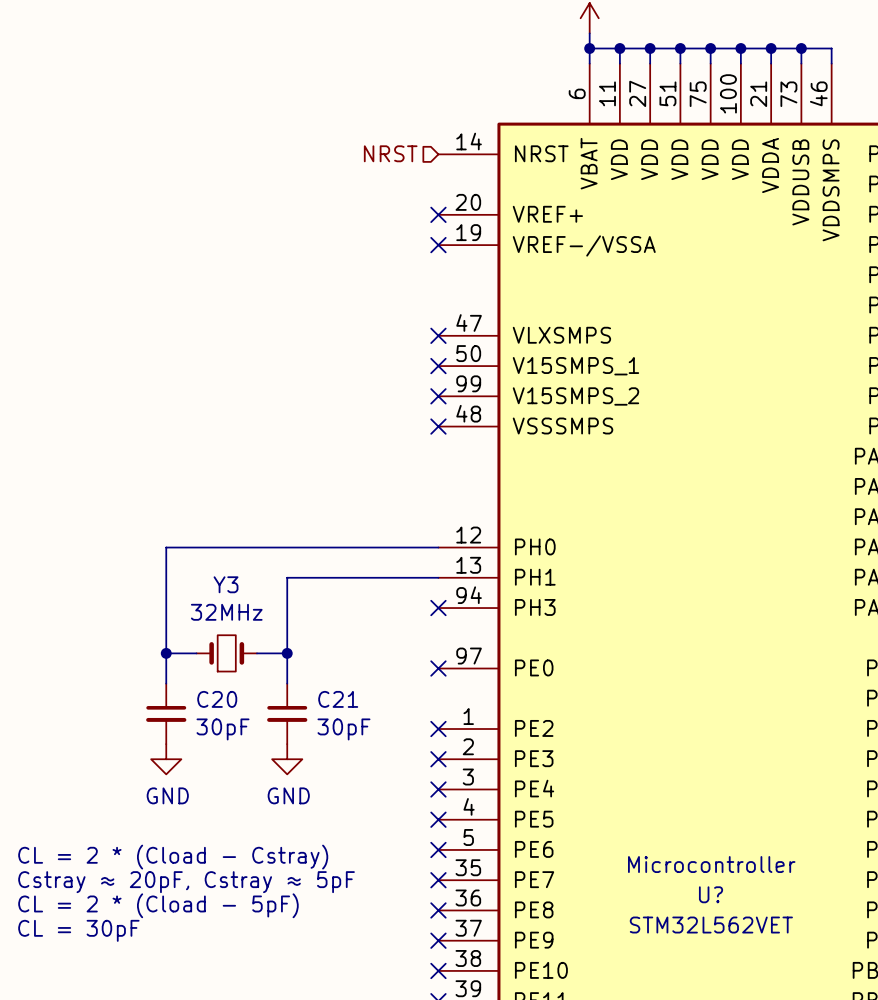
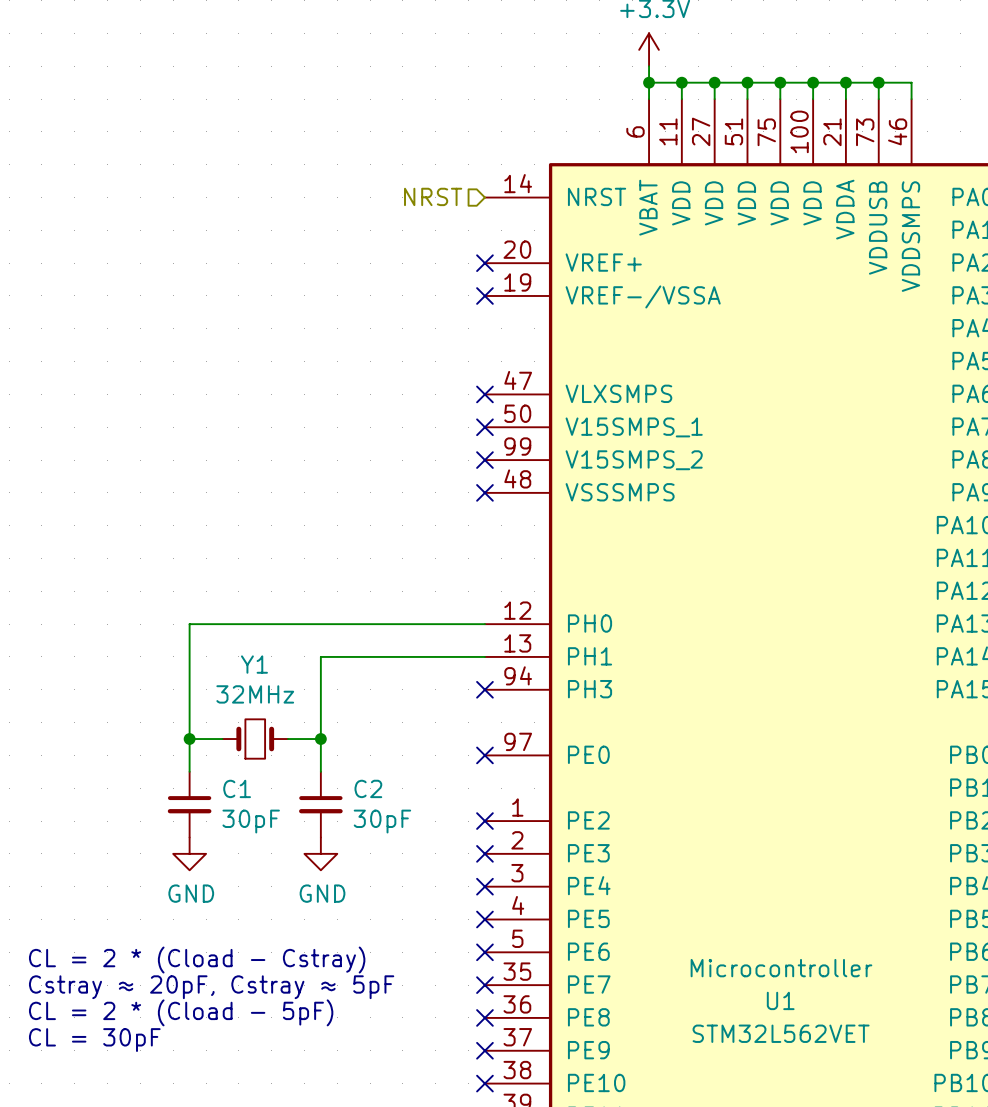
Y3 name: Y3 (226, 584) -> Y1 (254, 664)
C20 name: C20 (217, 699) -> C1 (237, 788)
C21 name: C21 (338, 699) -> C2 (368, 788)
U? name: U? (711, 894) -> U1 (780, 1000)

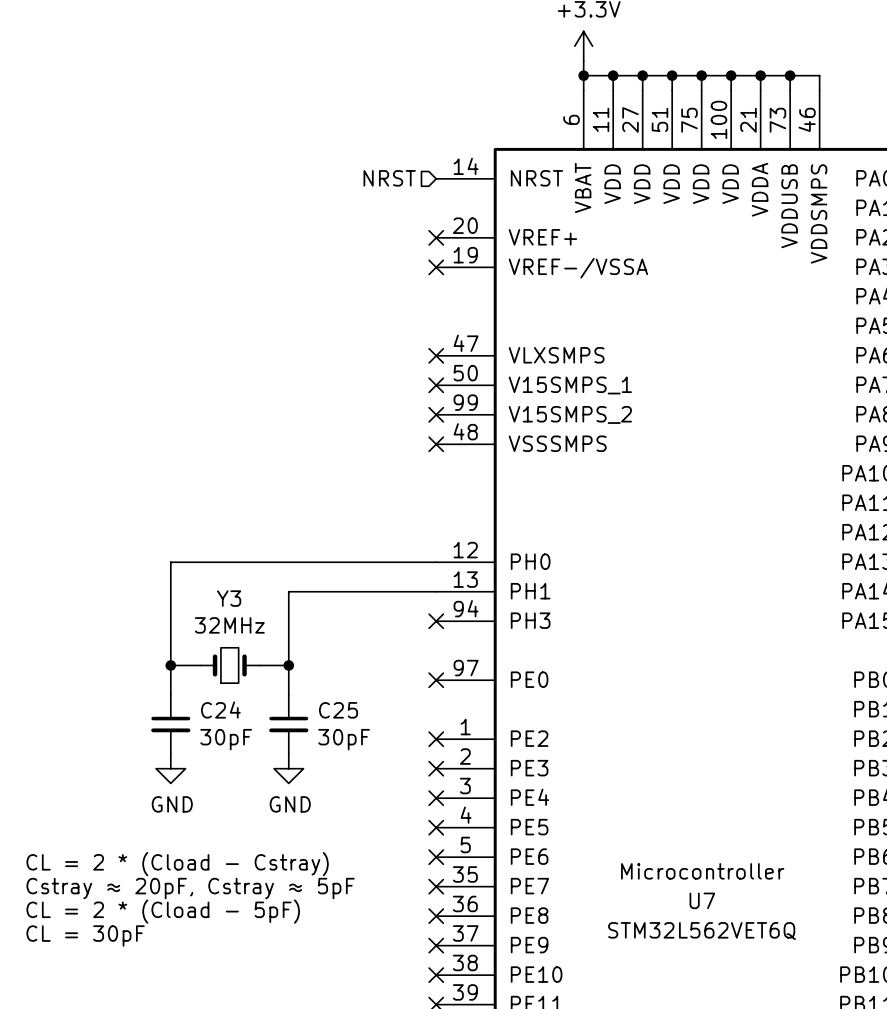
Y1 name: Y1 (254, 664) -> Y3 (229, 598)
C1 name: C1 (237, 788) -> C24 (220, 709)
C2 name: C2 (368, 788) -> C25 (338, 710)
U1 name: U1 (780, 1000) -> U7 (702, 900)
U1 value: STM32L562VET (781, 1033) -> STM32L562VET6Q (702, 931)

